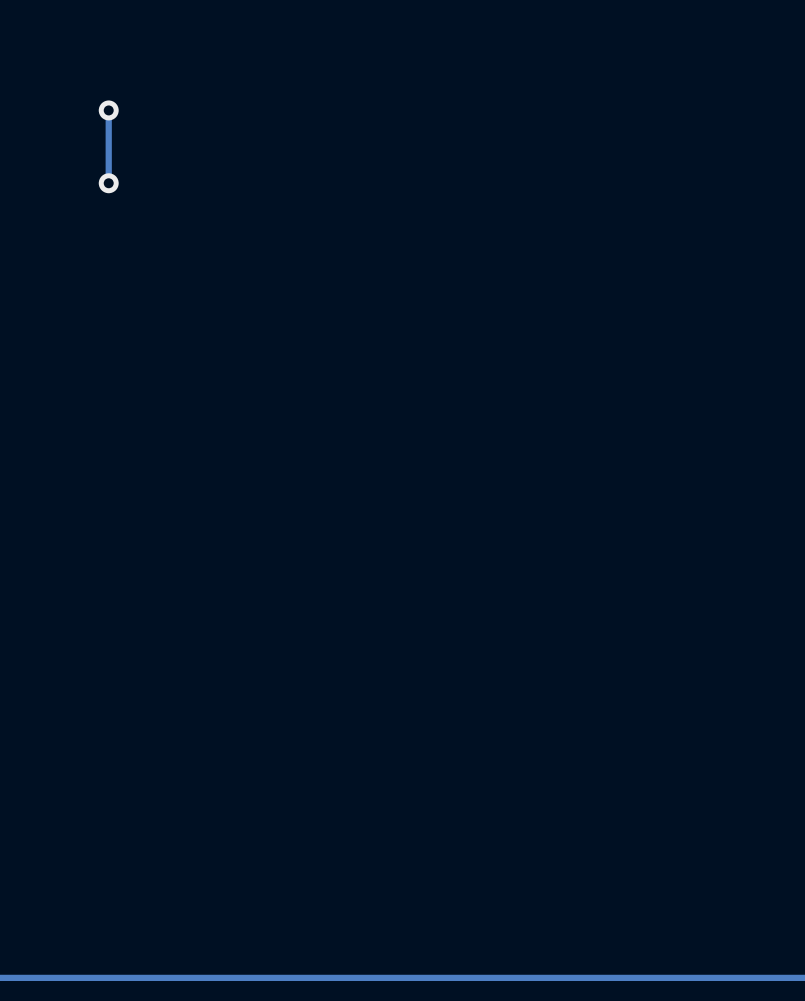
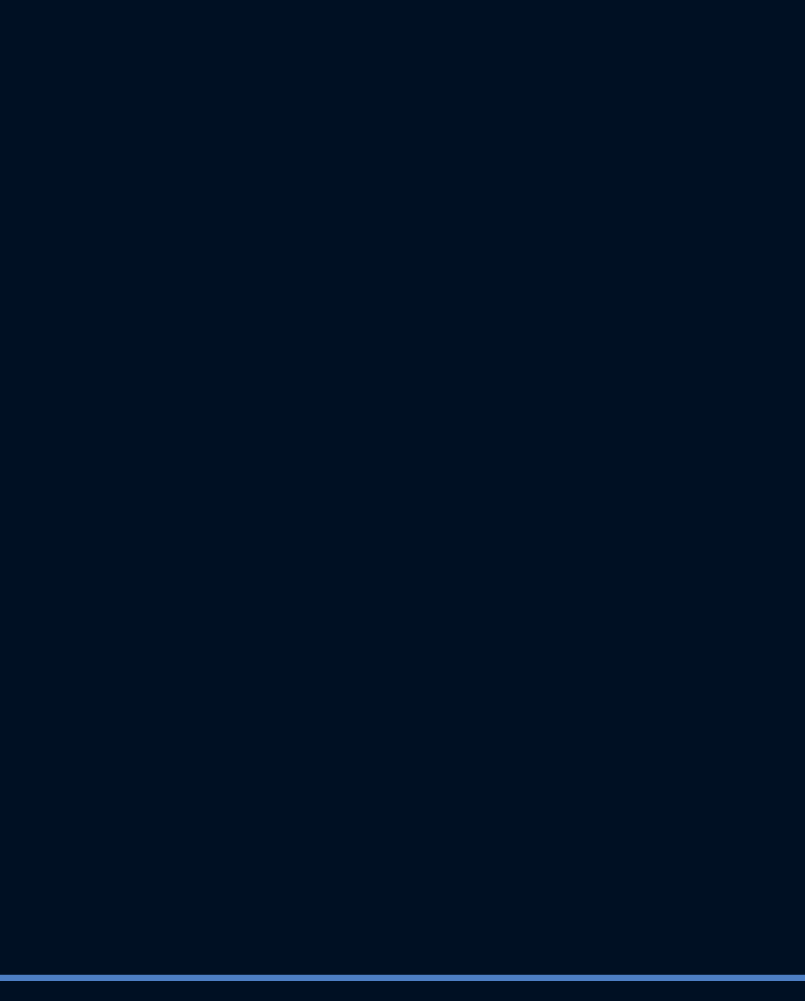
track: (108, 110) (108, 183) -> none
via: (108, 110) -> none
via: (108, 183) -> none

